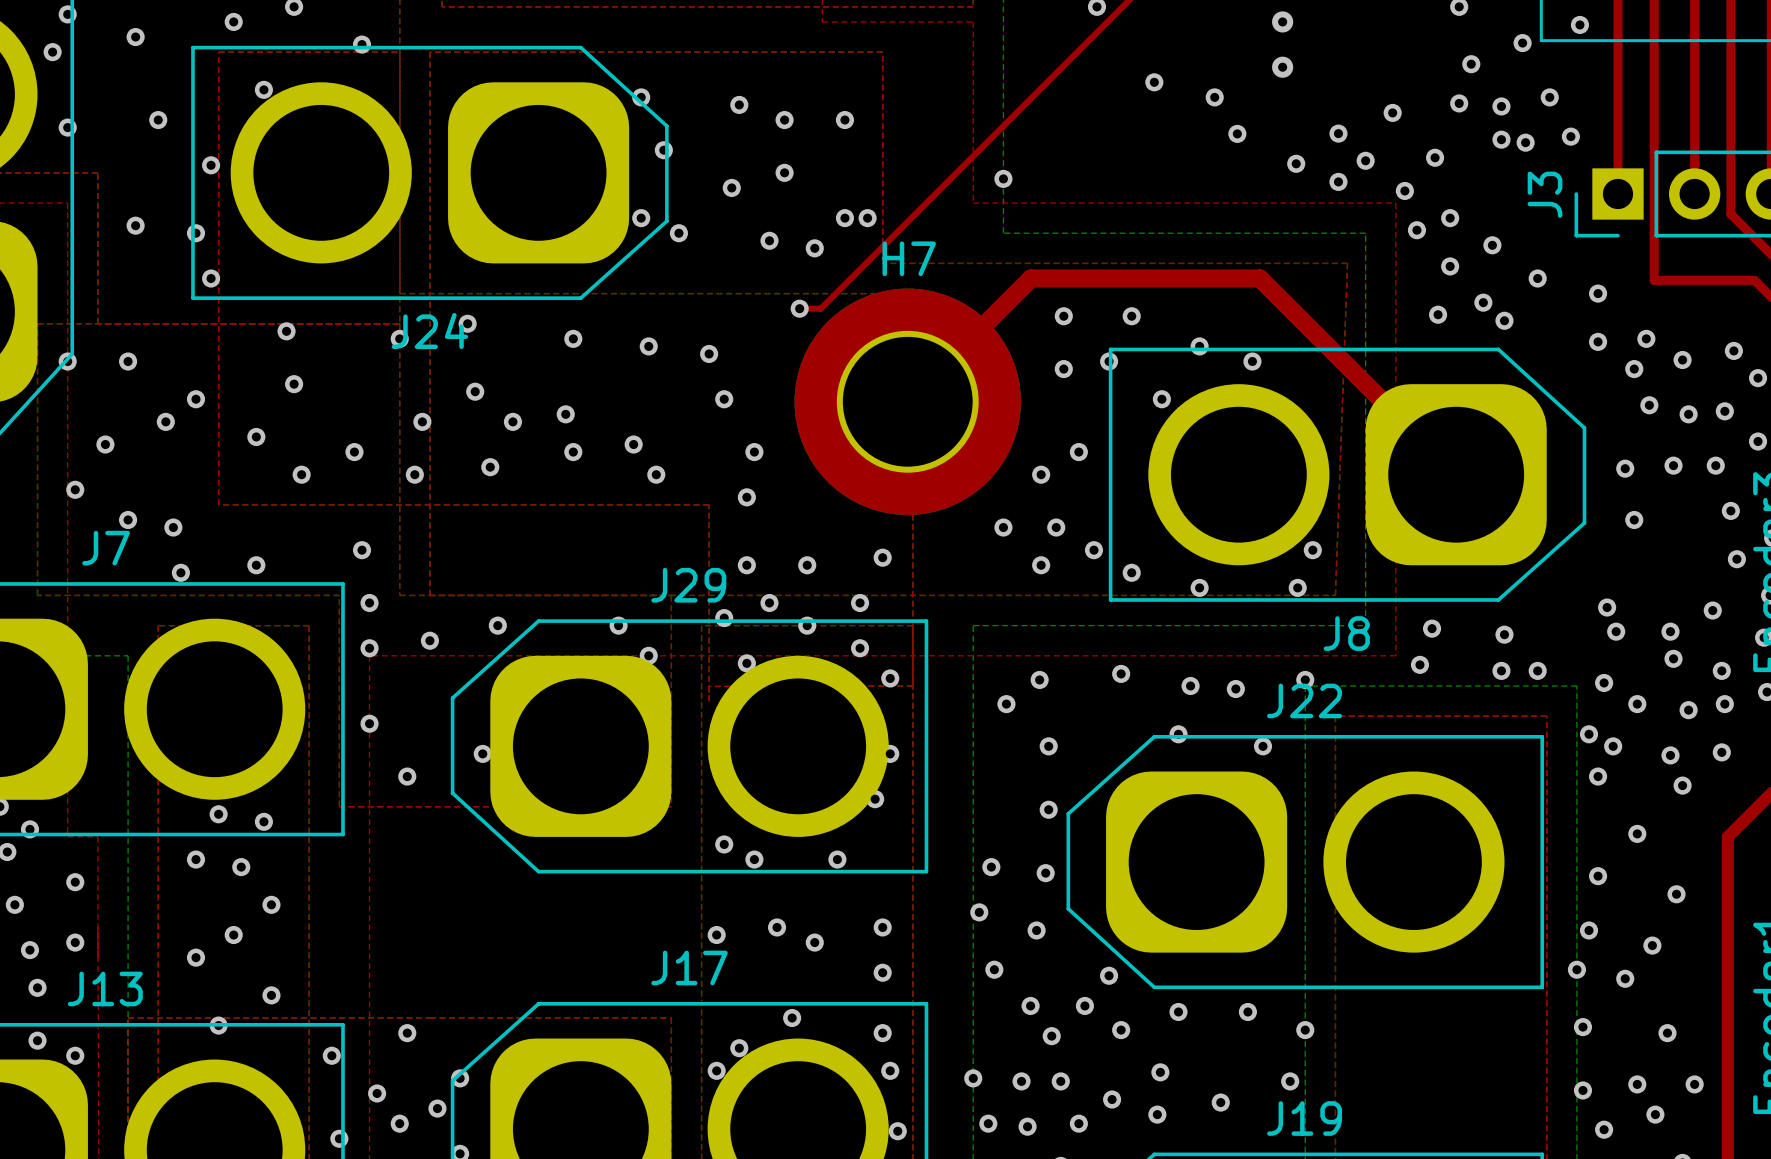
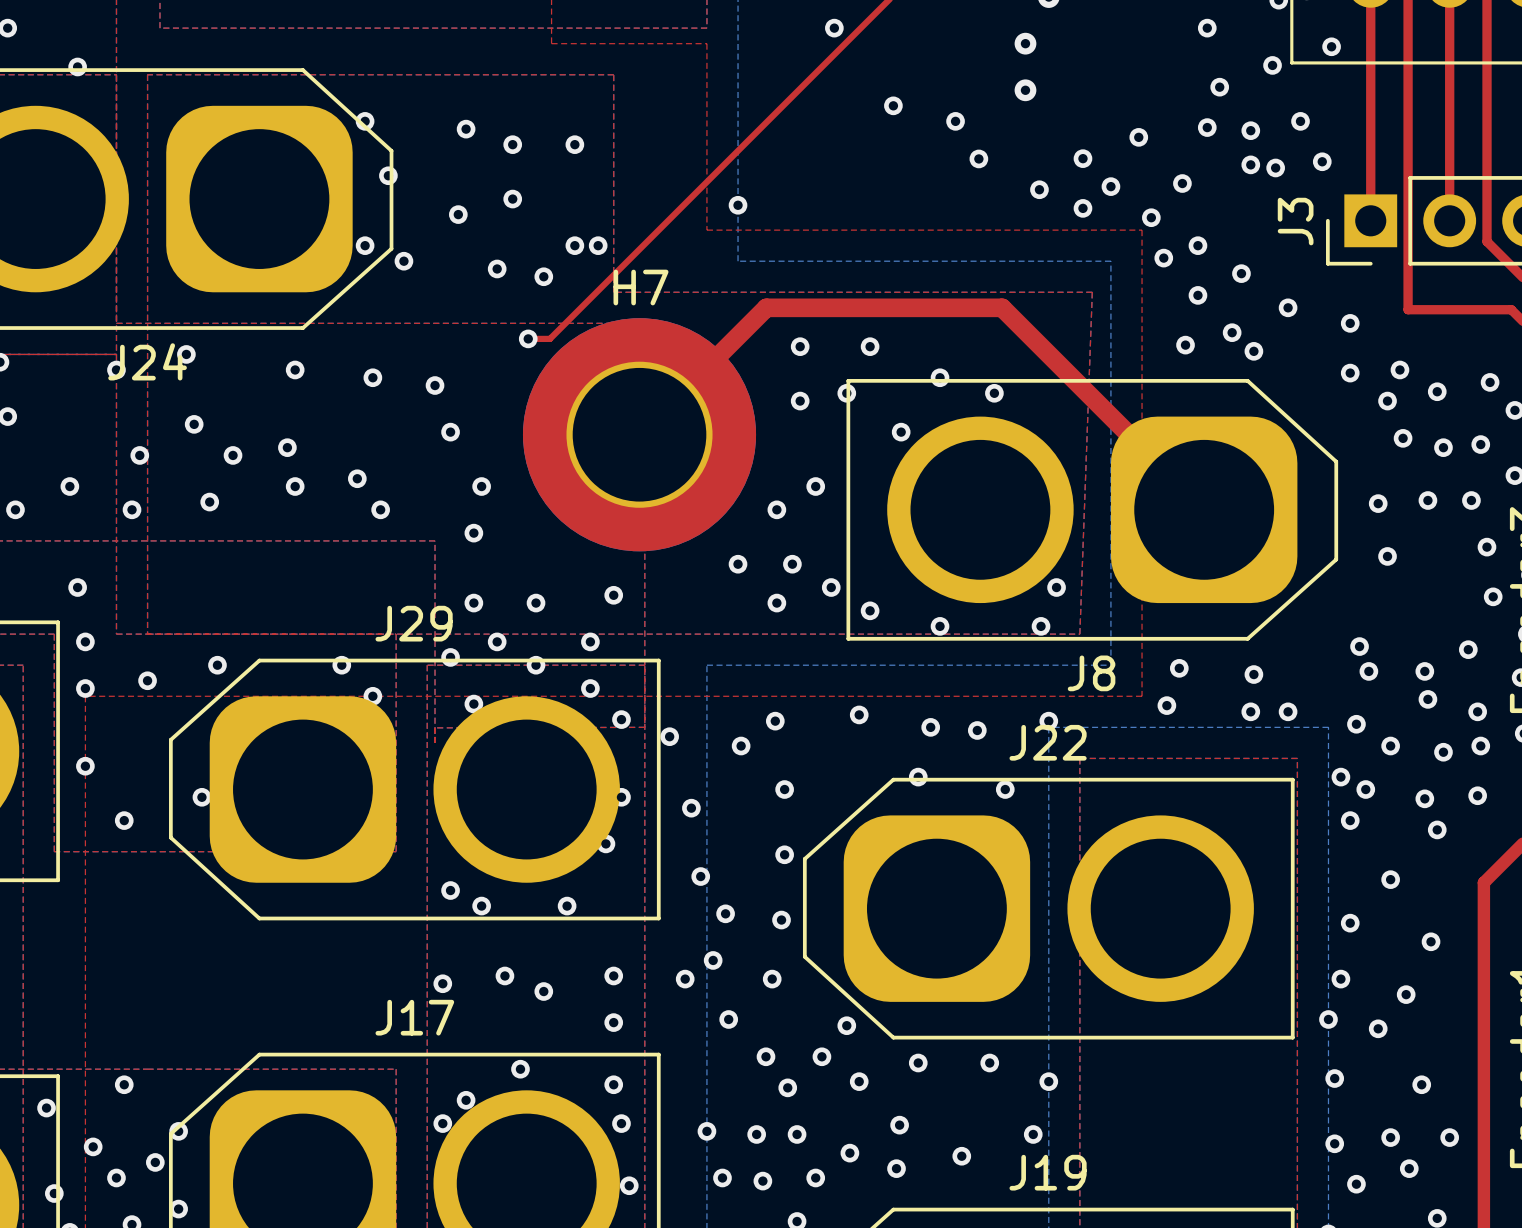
via: none -> (669, 736)
via: none -> (691, 808)
via: none -> (700, 876)
via: none -> (685, 979)

